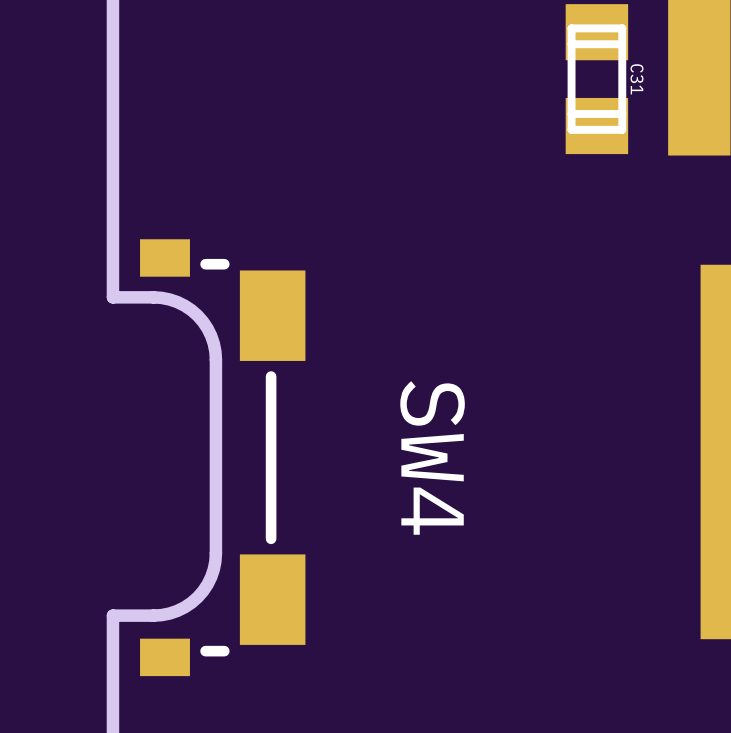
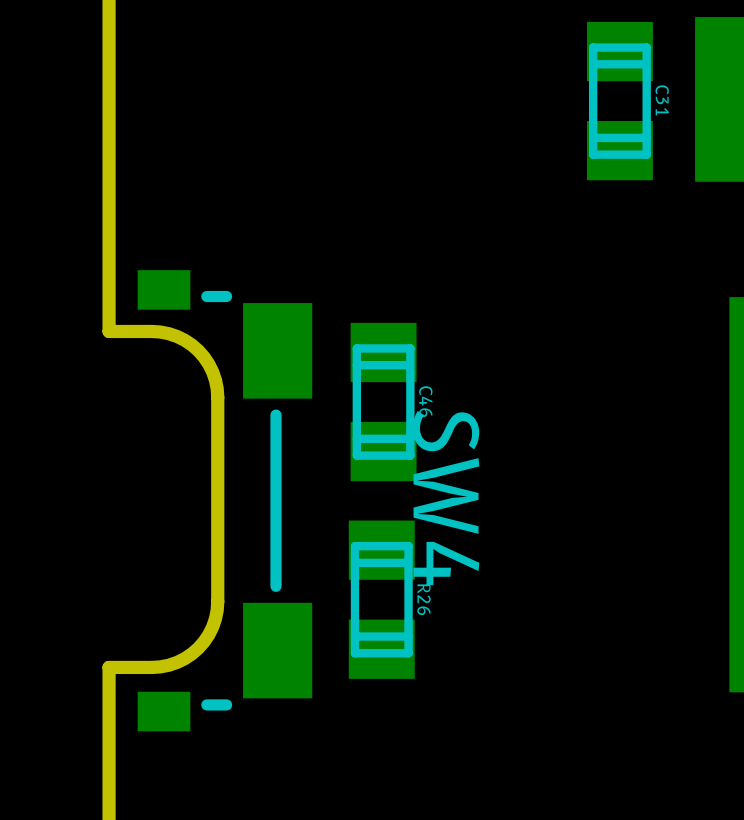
C46: none -> (383, 402)
R26: none -> (381, 599)

